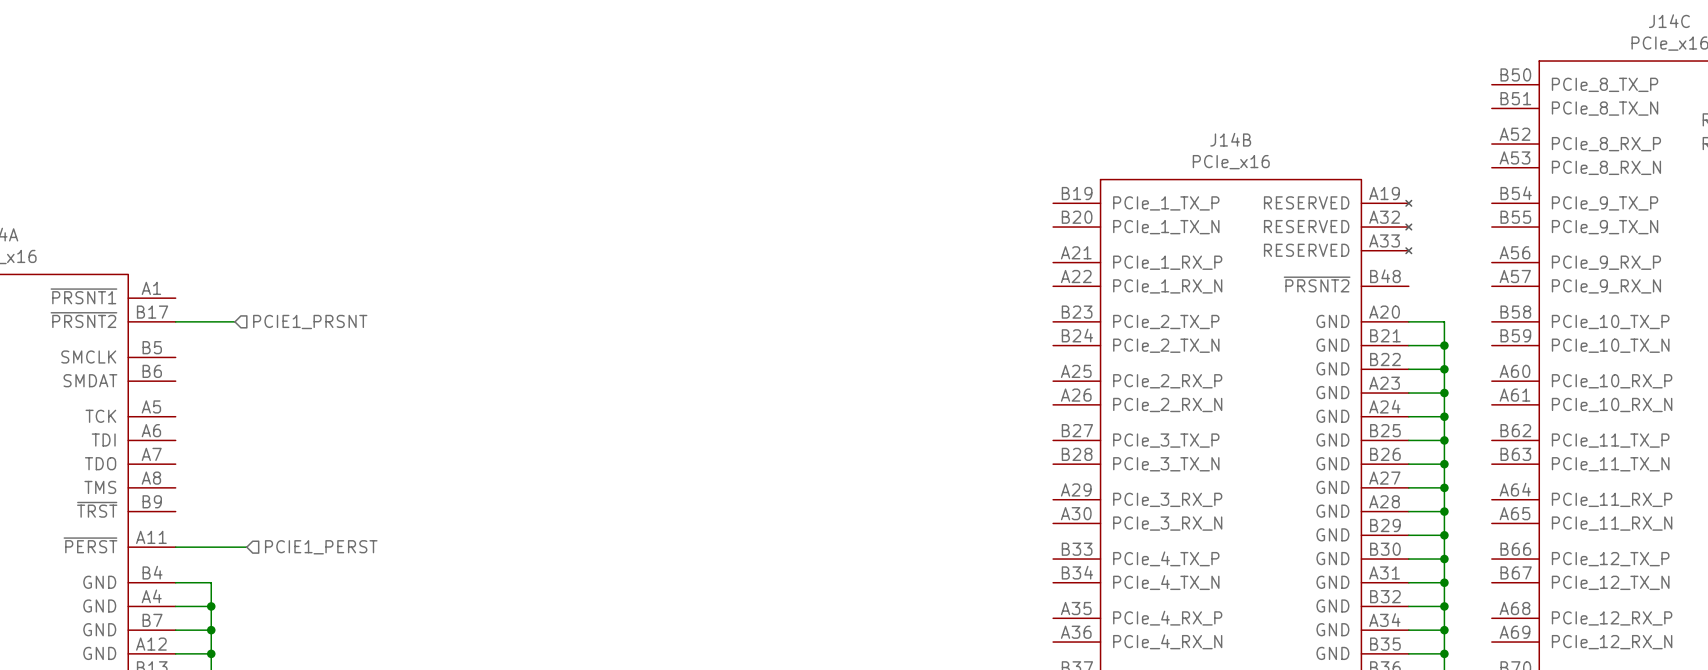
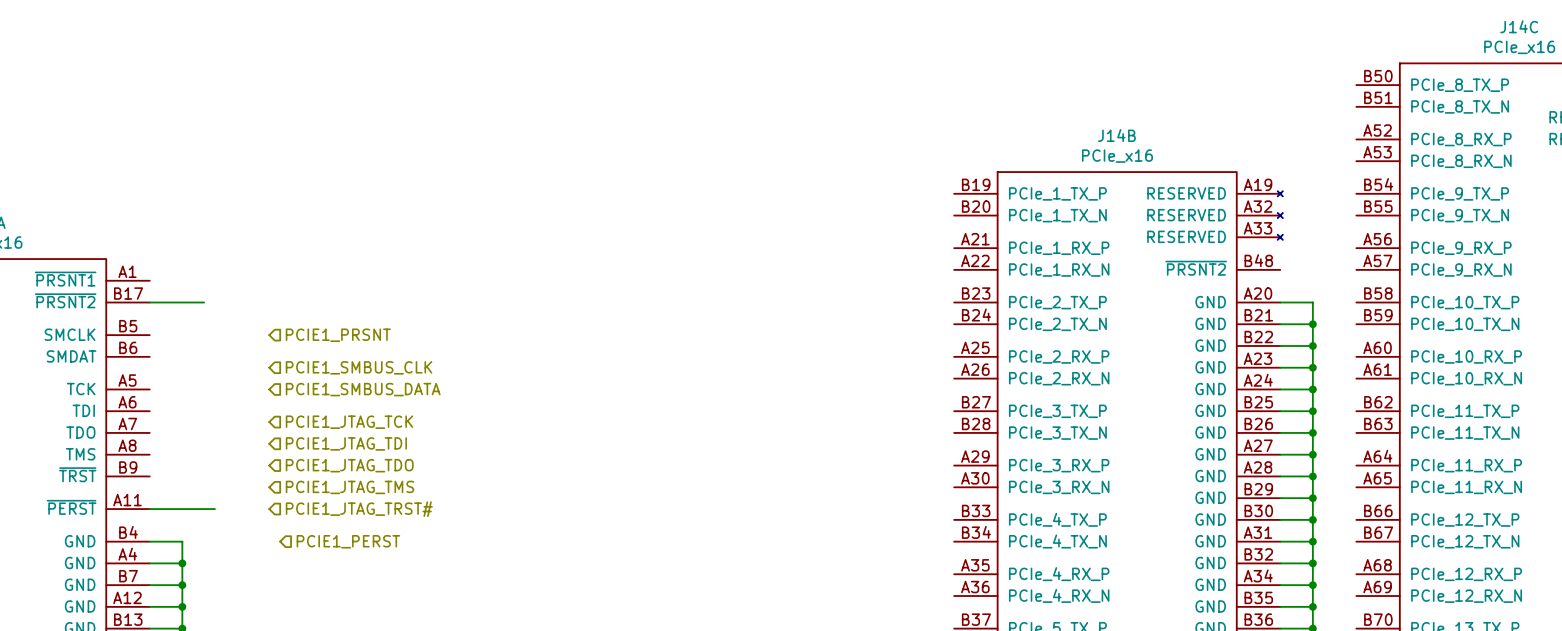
hierarchical label position: PCIE1_PRSNT (310, 321) -> PCIE1_PRSNT (338, 335)
hierarchical label: none -> PCIE1_SMBUS_CLK (359, 367)
hierarchical label: none -> PCIE1_SMBUS_DATA (363, 389)
hierarchical label: none -> PCIE1_JTAG_TCK (349, 422)
hierarchical label: none -> PCIE1_JTAG_TDI (346, 443)
hierarchical label: none -> PCIE1_JTAG_TDO (349, 465)
hierarchical label: none -> PCIE1_JTAG_TMS (349, 487)
hierarchical label position: PCIE1_PERST (321, 547) -> PCIE1_PERST (348, 541)
hierarchical label: none -> PCIE1_JTAG_TRST# (359, 509)

